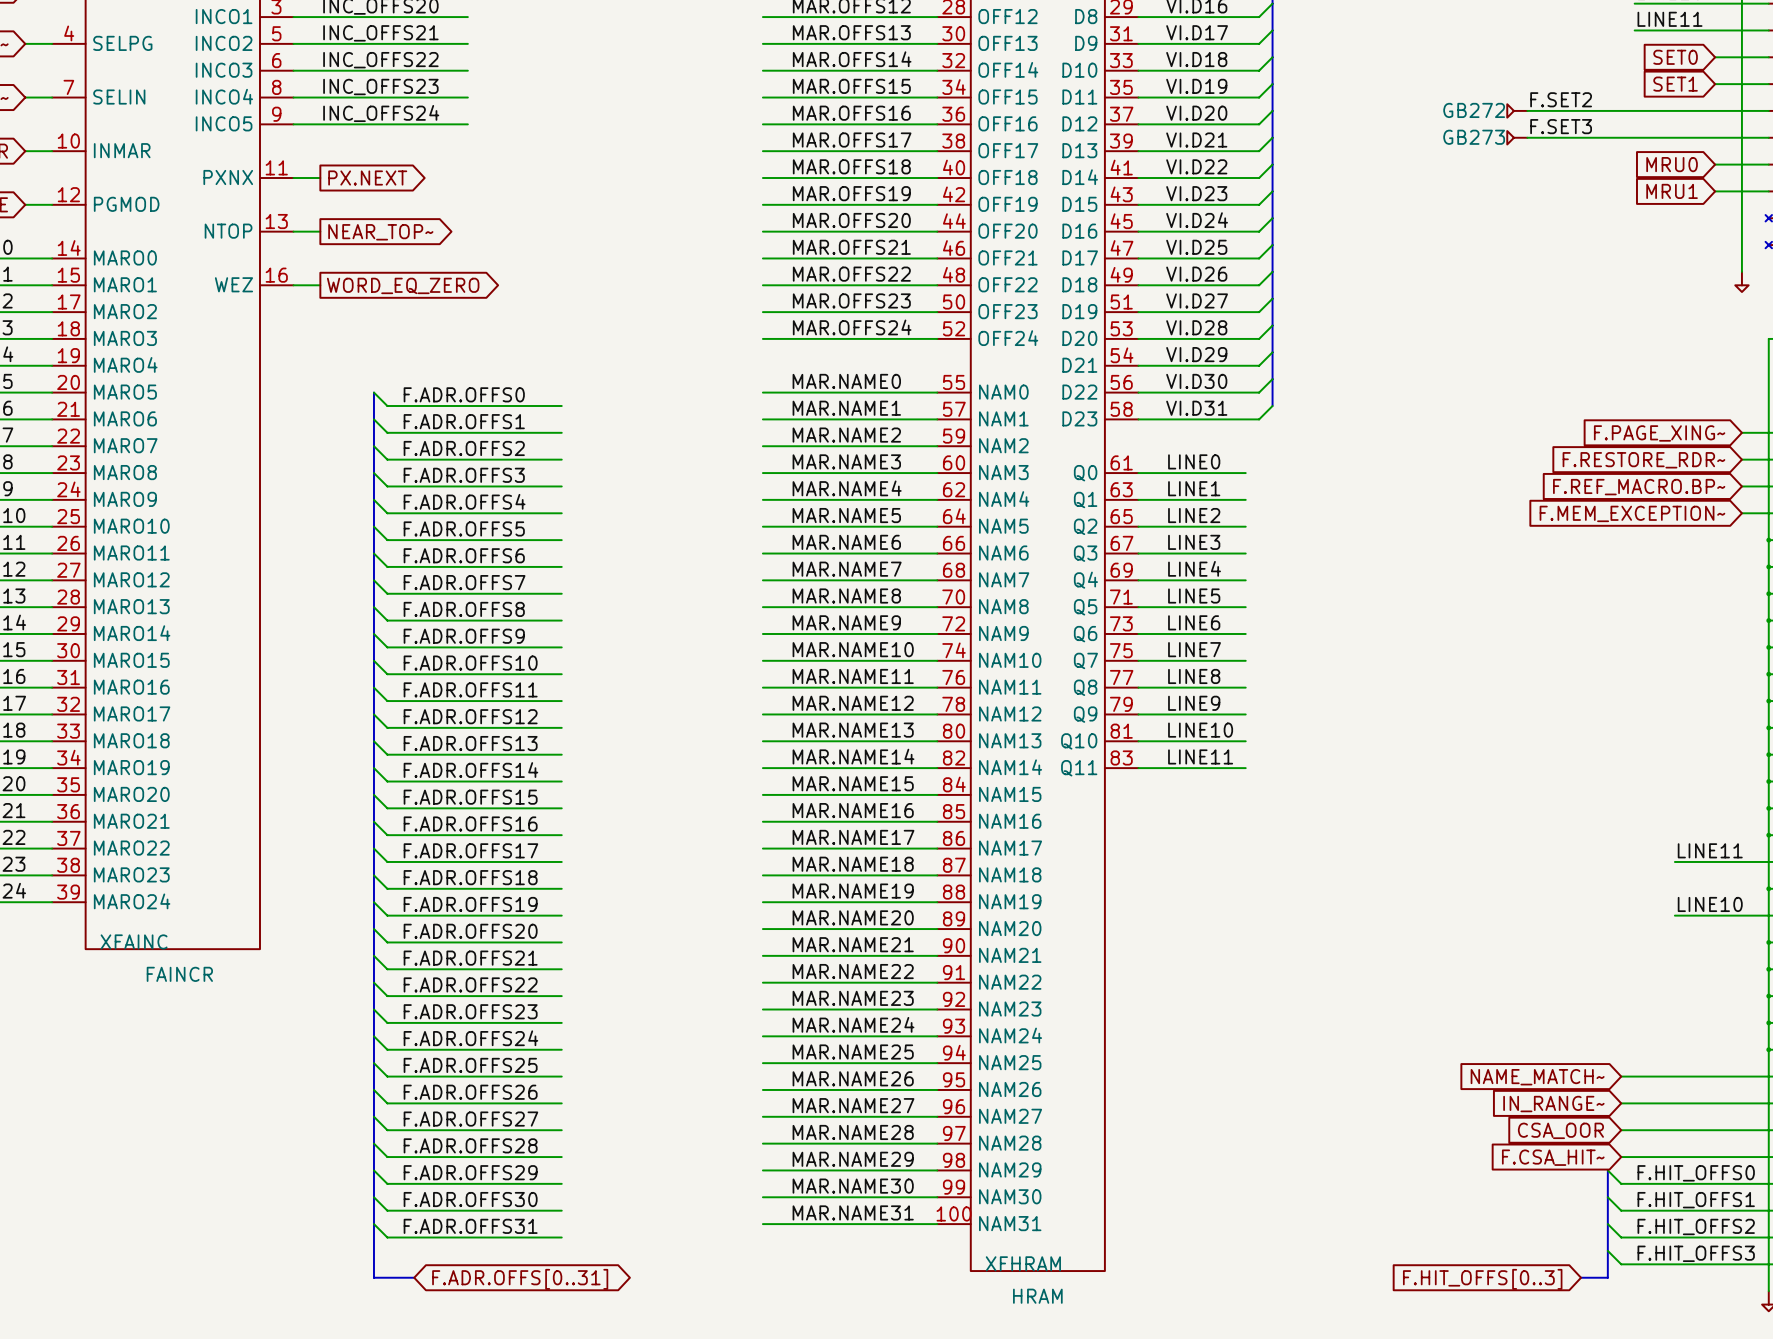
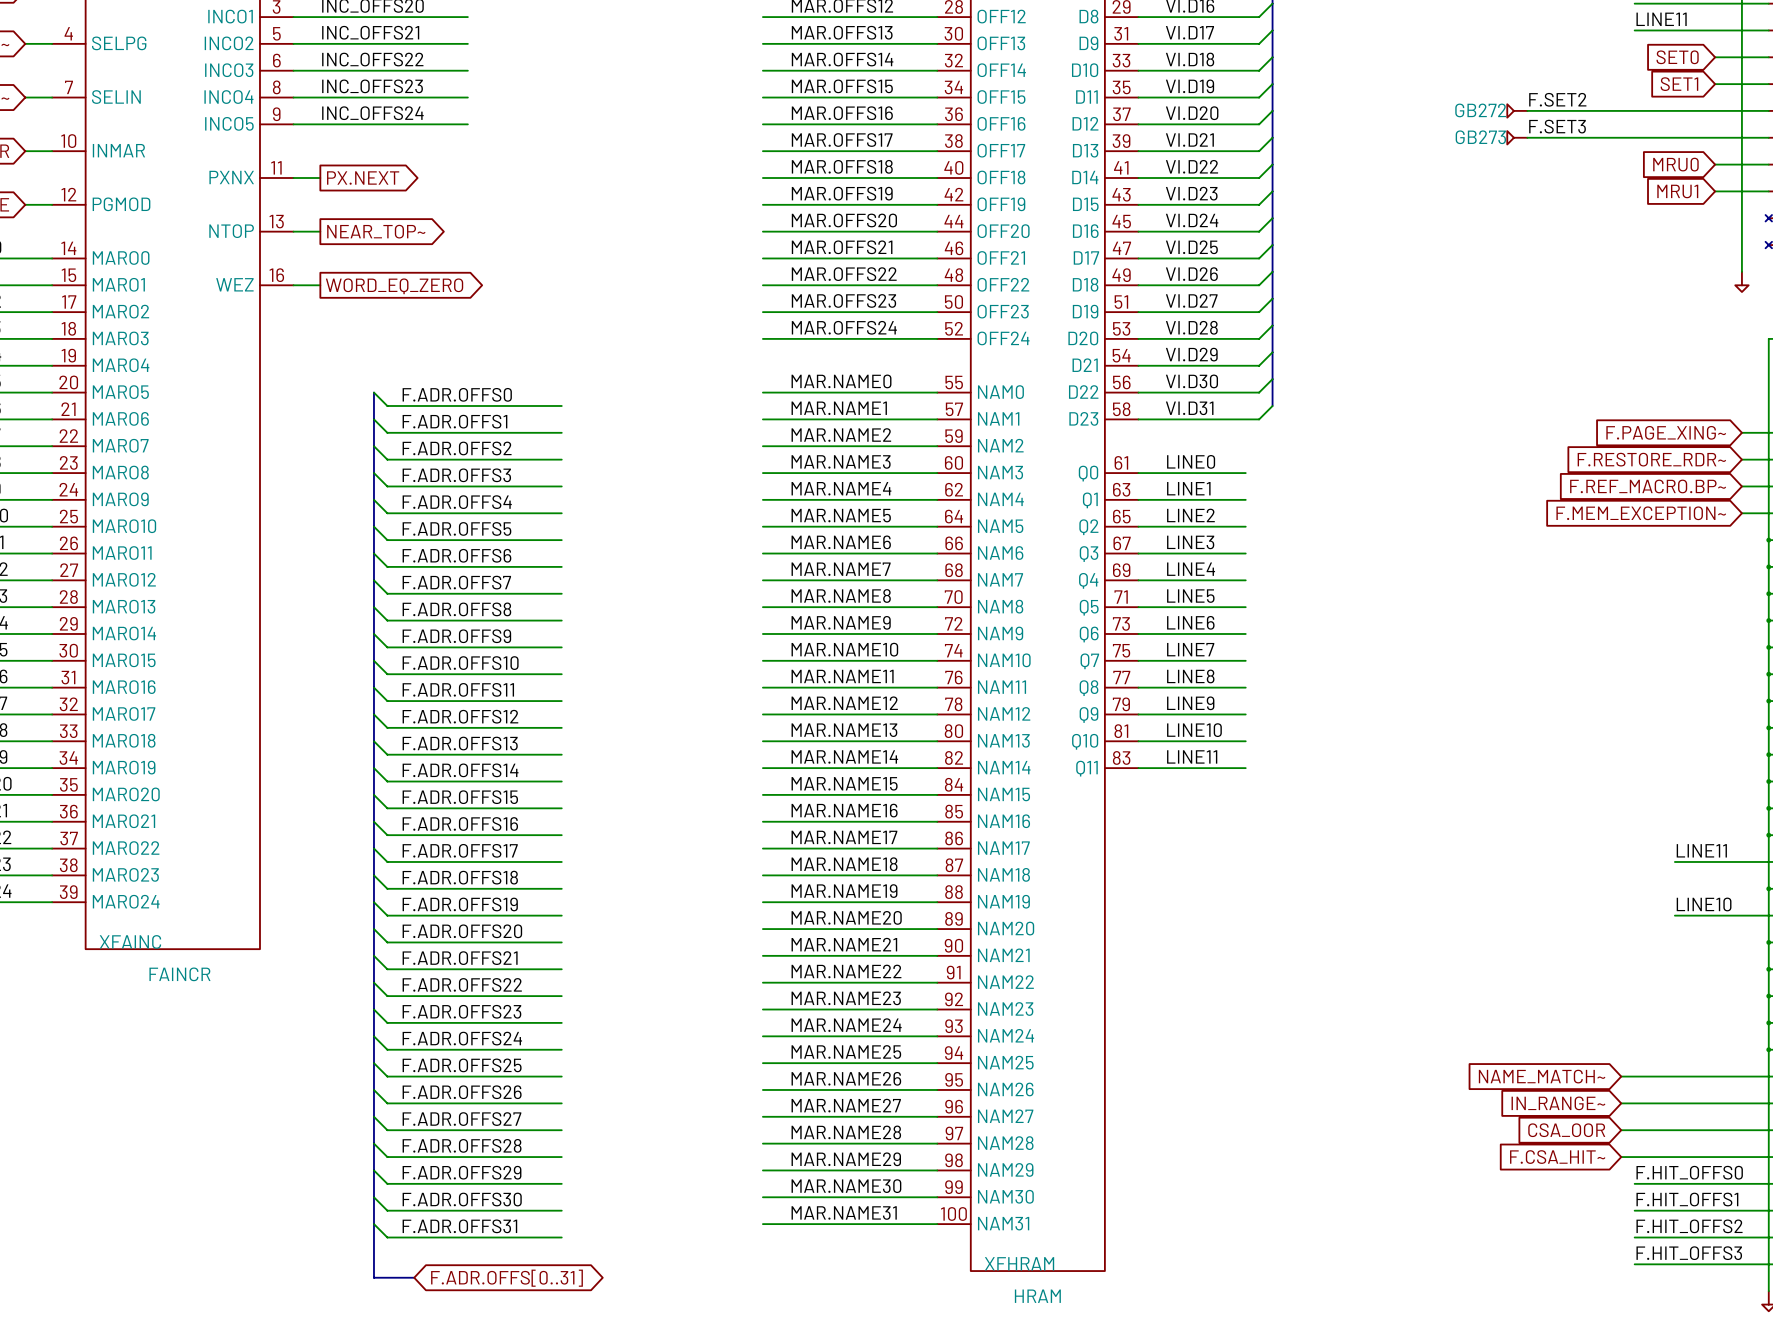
wire: (1607, 1170) (1621, 1183) (1634, 1183) -> none
bus: (1607, 1170) (1607, 1277) (1581, 1277) -> none
wire: (1607, 1197) (1621, 1210) (1634, 1210) -> none
wire: (1607, 1224) (1621, 1237) (1634, 1237) -> none
wire: (1607, 1250) (1621, 1264) (1634, 1264) -> none
global label: F.HIT_OFFS[0..3] (1482, 1279) -> none

